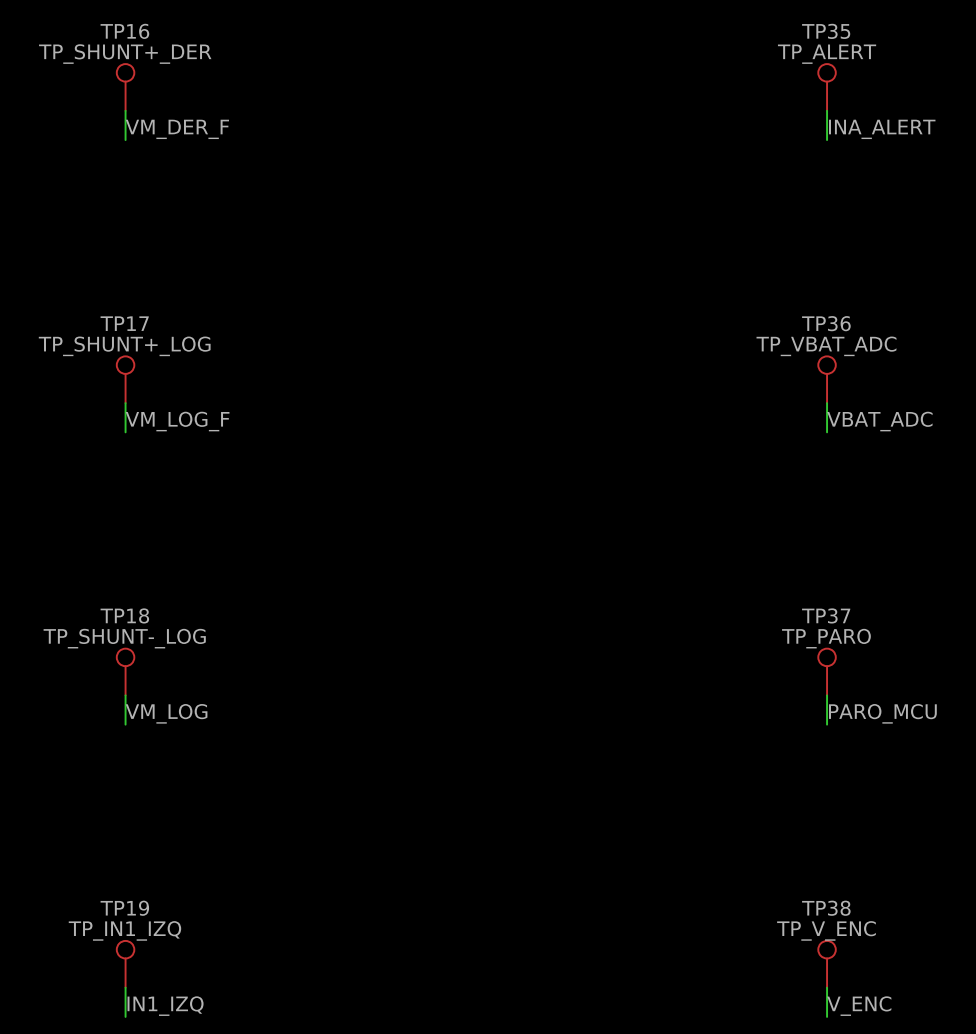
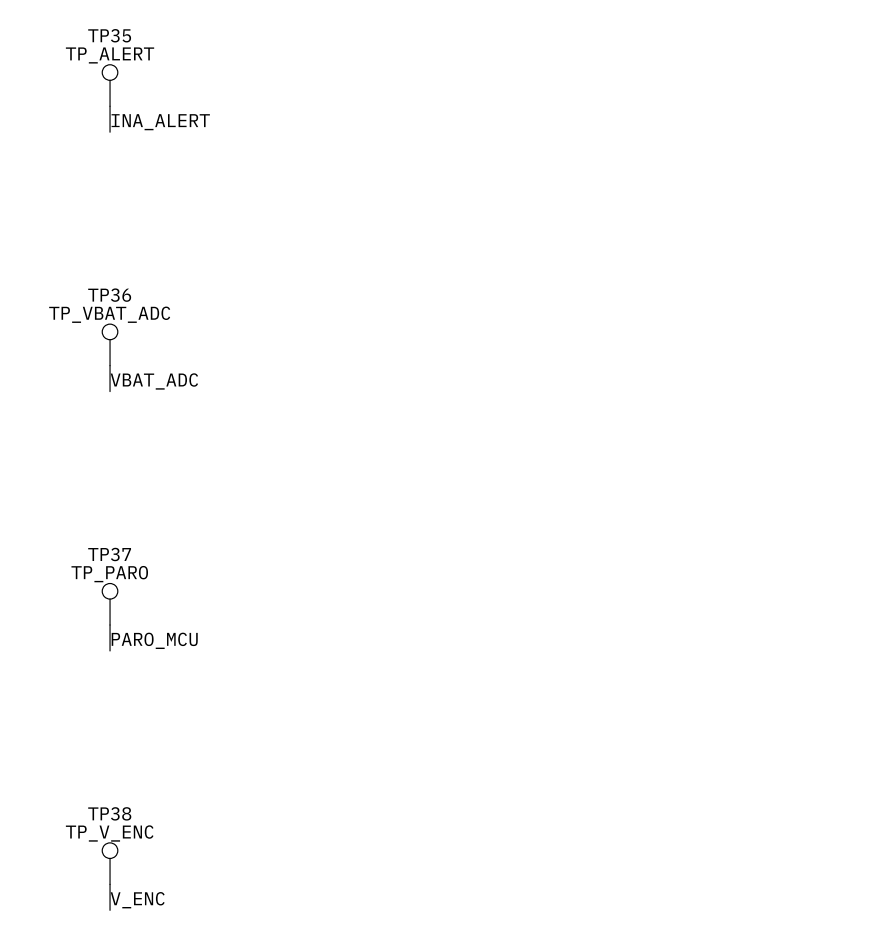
TP16 name: TP16 (124, 31) -> TP35 (109, 35)
TP16 value: TP_SHUNT+_DER (125, 54) -> TP_ALERT (110, 55)
TP35: TP_ALERT (827, 87) -> none
wire: (827, 110) (827, 140) -> none
label: VM_DER_F (177, 129) -> INA_ALERT (160, 122)
label: INA_ALERT (882, 129) -> none
TP17 name: TP17 (124, 323) -> TP36 (109, 295)
TP17 value: TP_SHUNT+_LOG (124, 346) -> TP_VBAT_ADC (109, 314)
TP36: TP_VBAT_ADC (827, 379) -> none
wire: (827, 403) (827, 432) -> none
label: VM_LOG_F (177, 421) -> VBAT_ADC (154, 381)
label: VBAT_ADC (879, 421) -> none
TP18 name: TP18 (124, 615) -> TP37 (109, 554)
TP18 value: TP_SHUNT-_LOG (124, 638) -> TP_PARO (109, 574)
TP37: TP_PARO (827, 672) -> none
wire: (827, 695) (827, 724) -> none
label: VM_LOG (166, 713) -> PARO_MCU (154, 640)
label: PARO_MCU (882, 713) -> none
TP19 name: TP19 (124, 908) -> TP38 (109, 813)
TP19 value: TP_IN1_IZQ (124, 930) -> TP_V_ENC (109, 833)
TP38: TP_V_ENC (827, 964) -> none
wire: (827, 987) (827, 1016) -> none
label: IN1_IZQ (165, 1006) -> V_ENC (137, 900)
label: V_ENC (859, 1006) -> none

